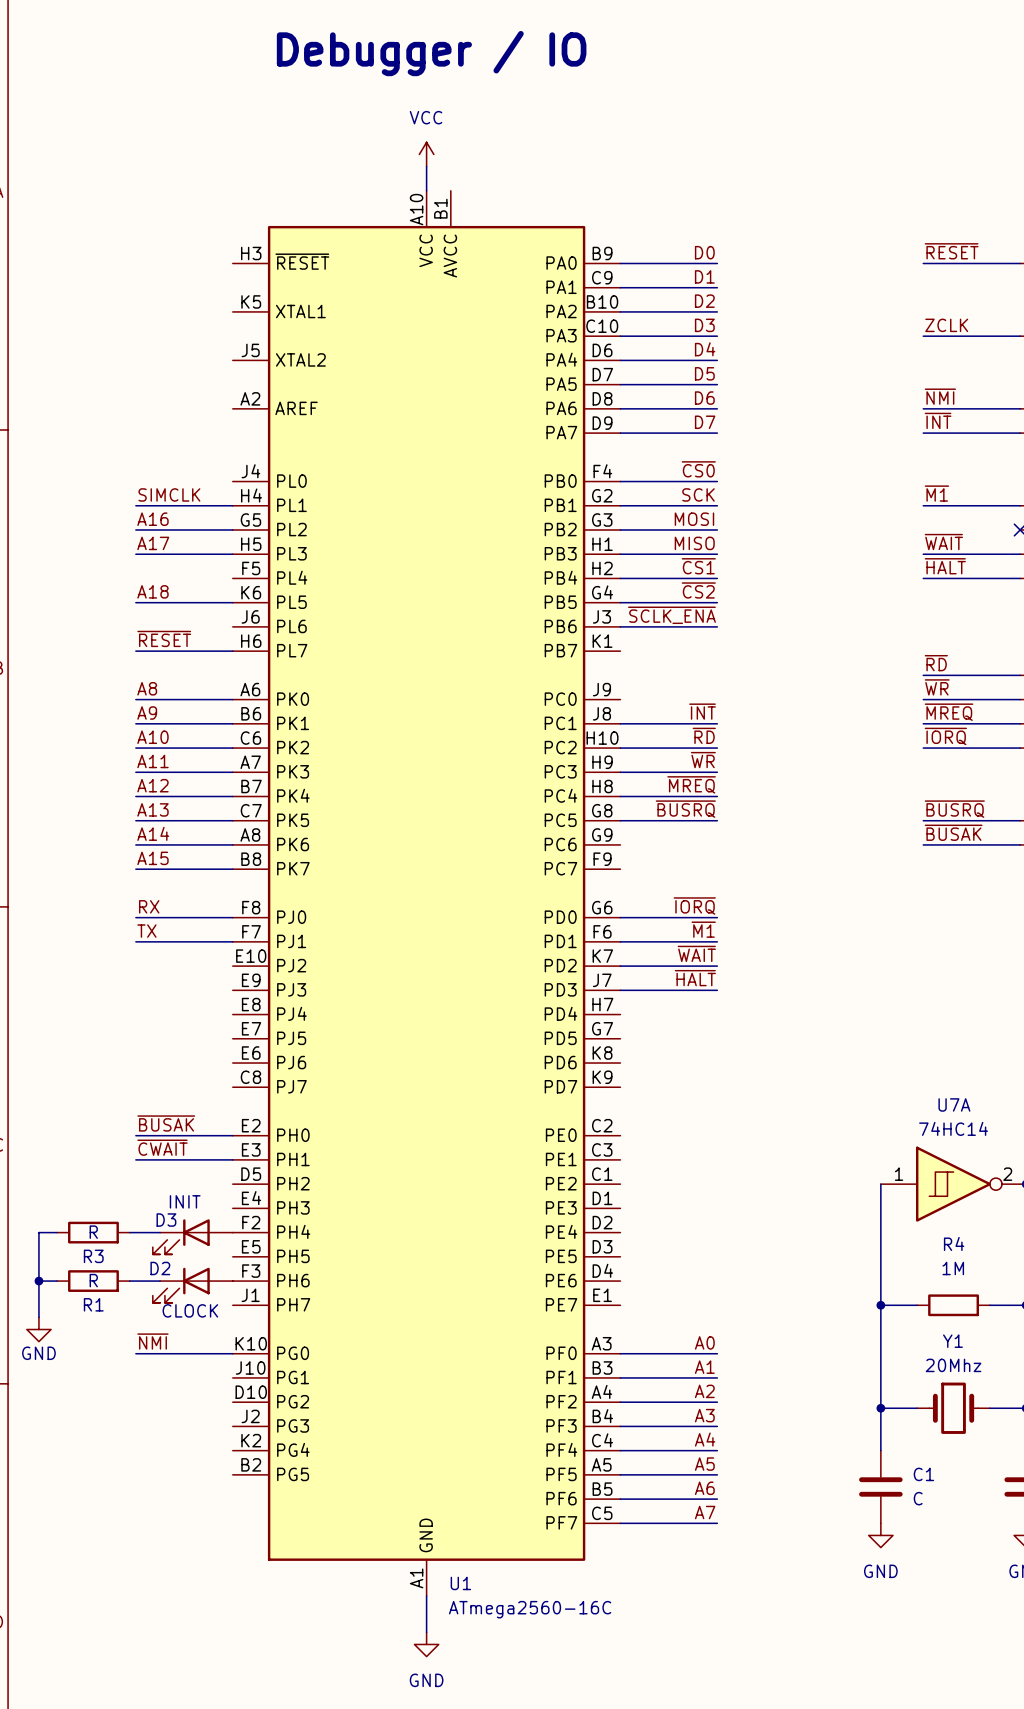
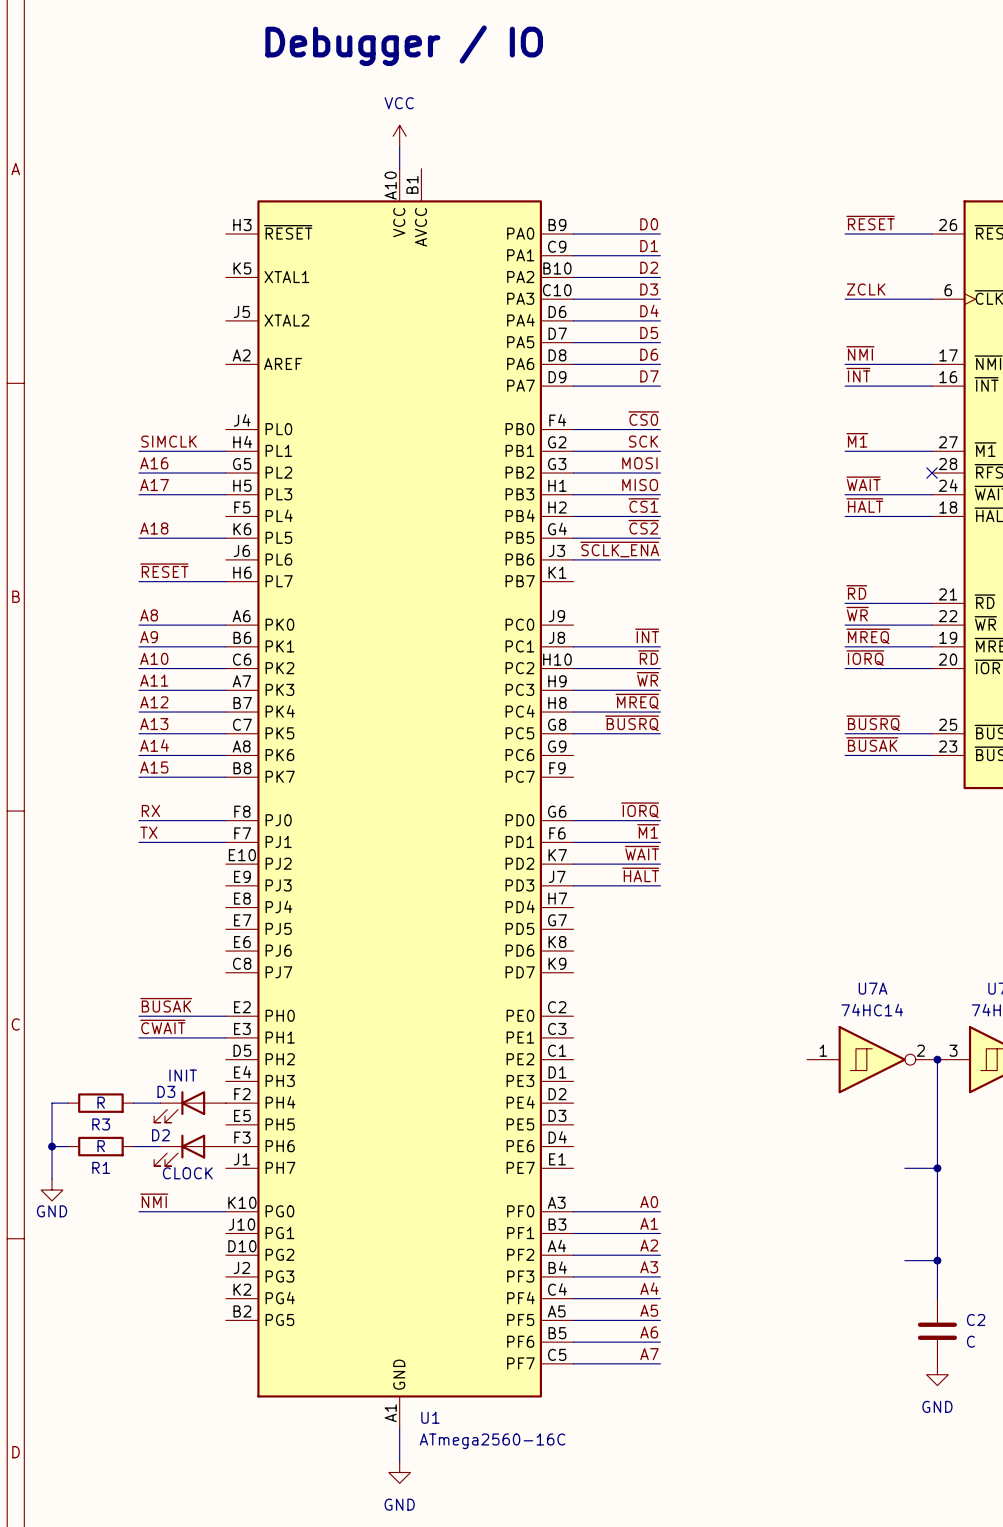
wire: (880, 1184) (880, 1450) -> none
wire: (880, 1305) (917, 1305) -> none
junction: (880, 1305) -> none
R4: 1M (953, 1305) -> none
wire: (880, 1408) (917, 1408) -> none
junction: (880, 1408) -> none
Y1: 20Mhz (953, 1408) -> none
C1: C (880, 1486) -> none
power symbol: GND (880, 1535) -> none

